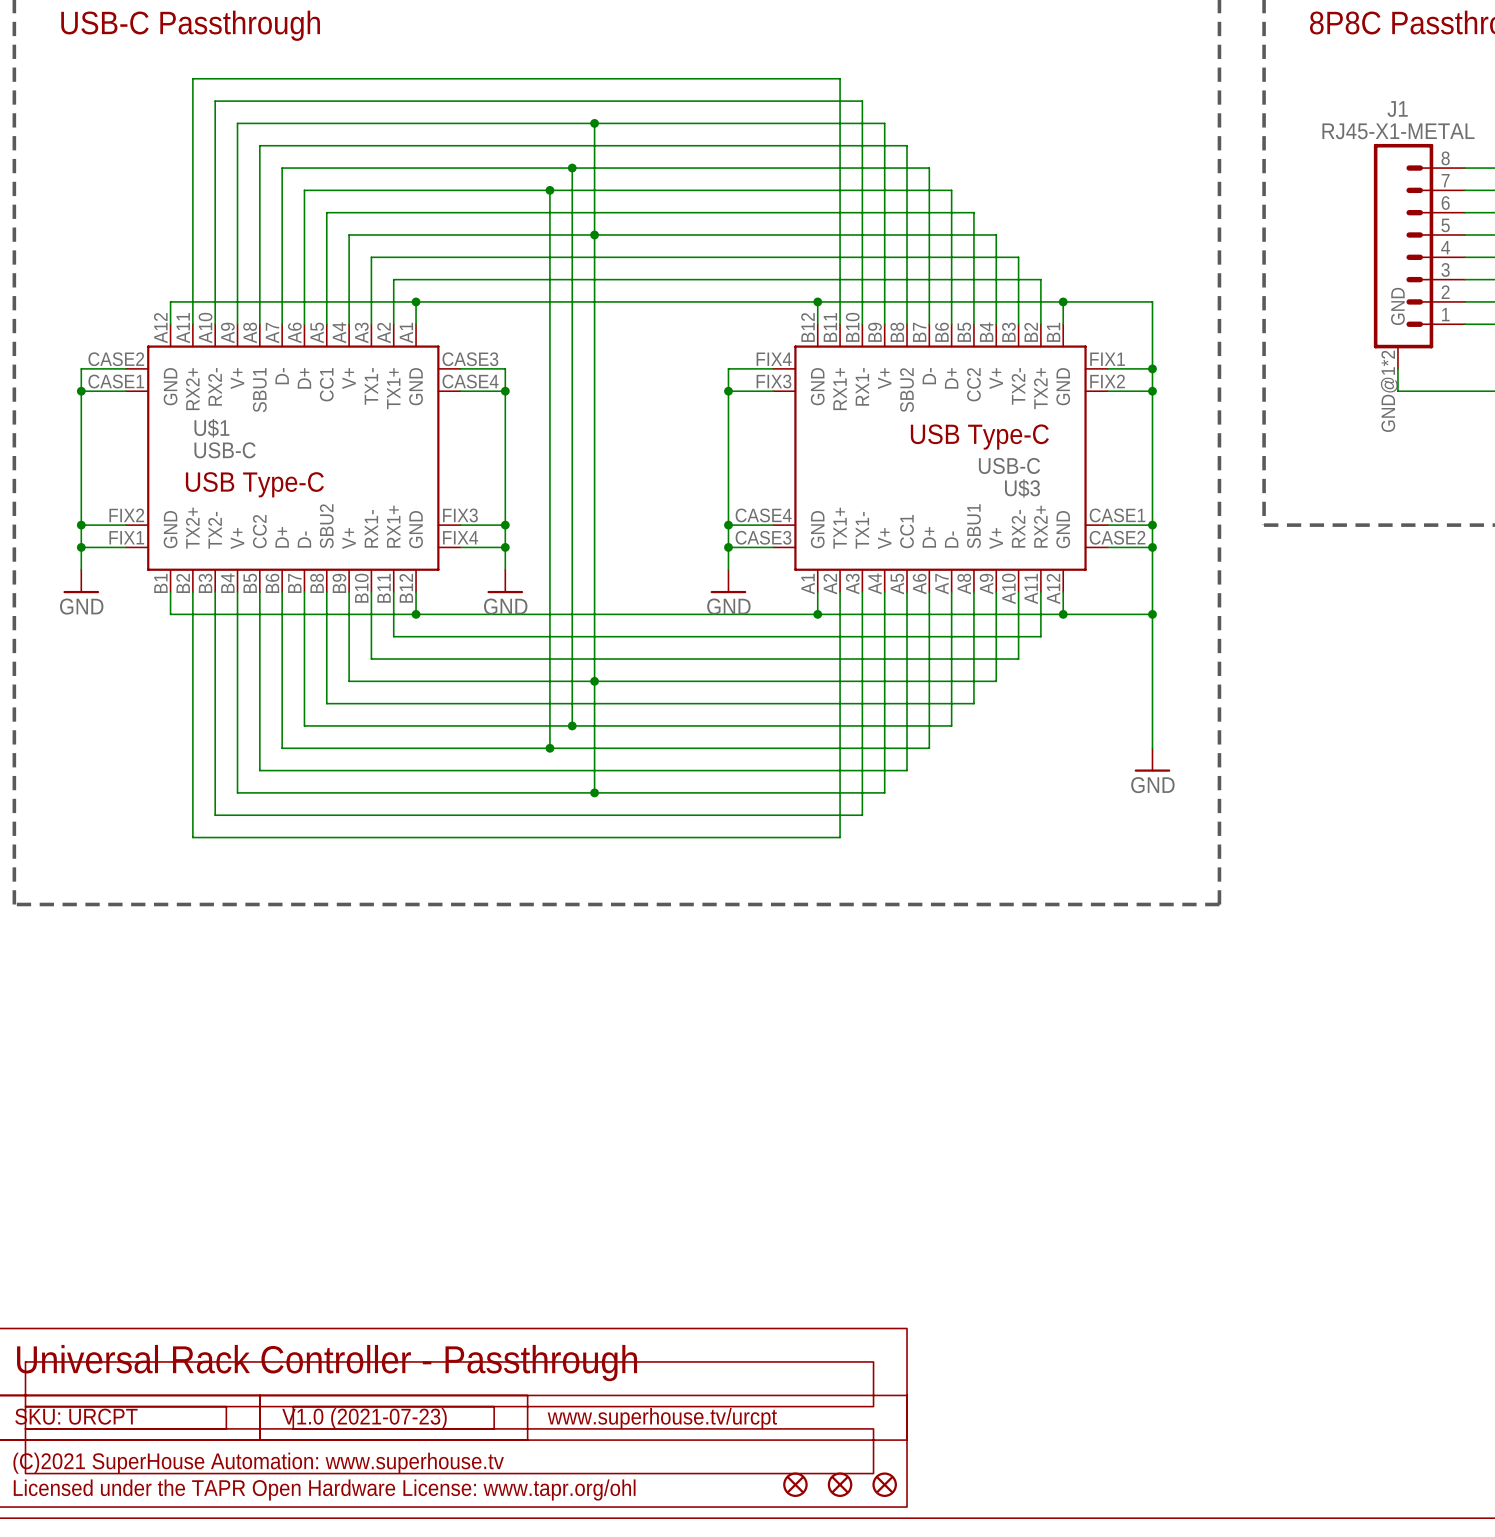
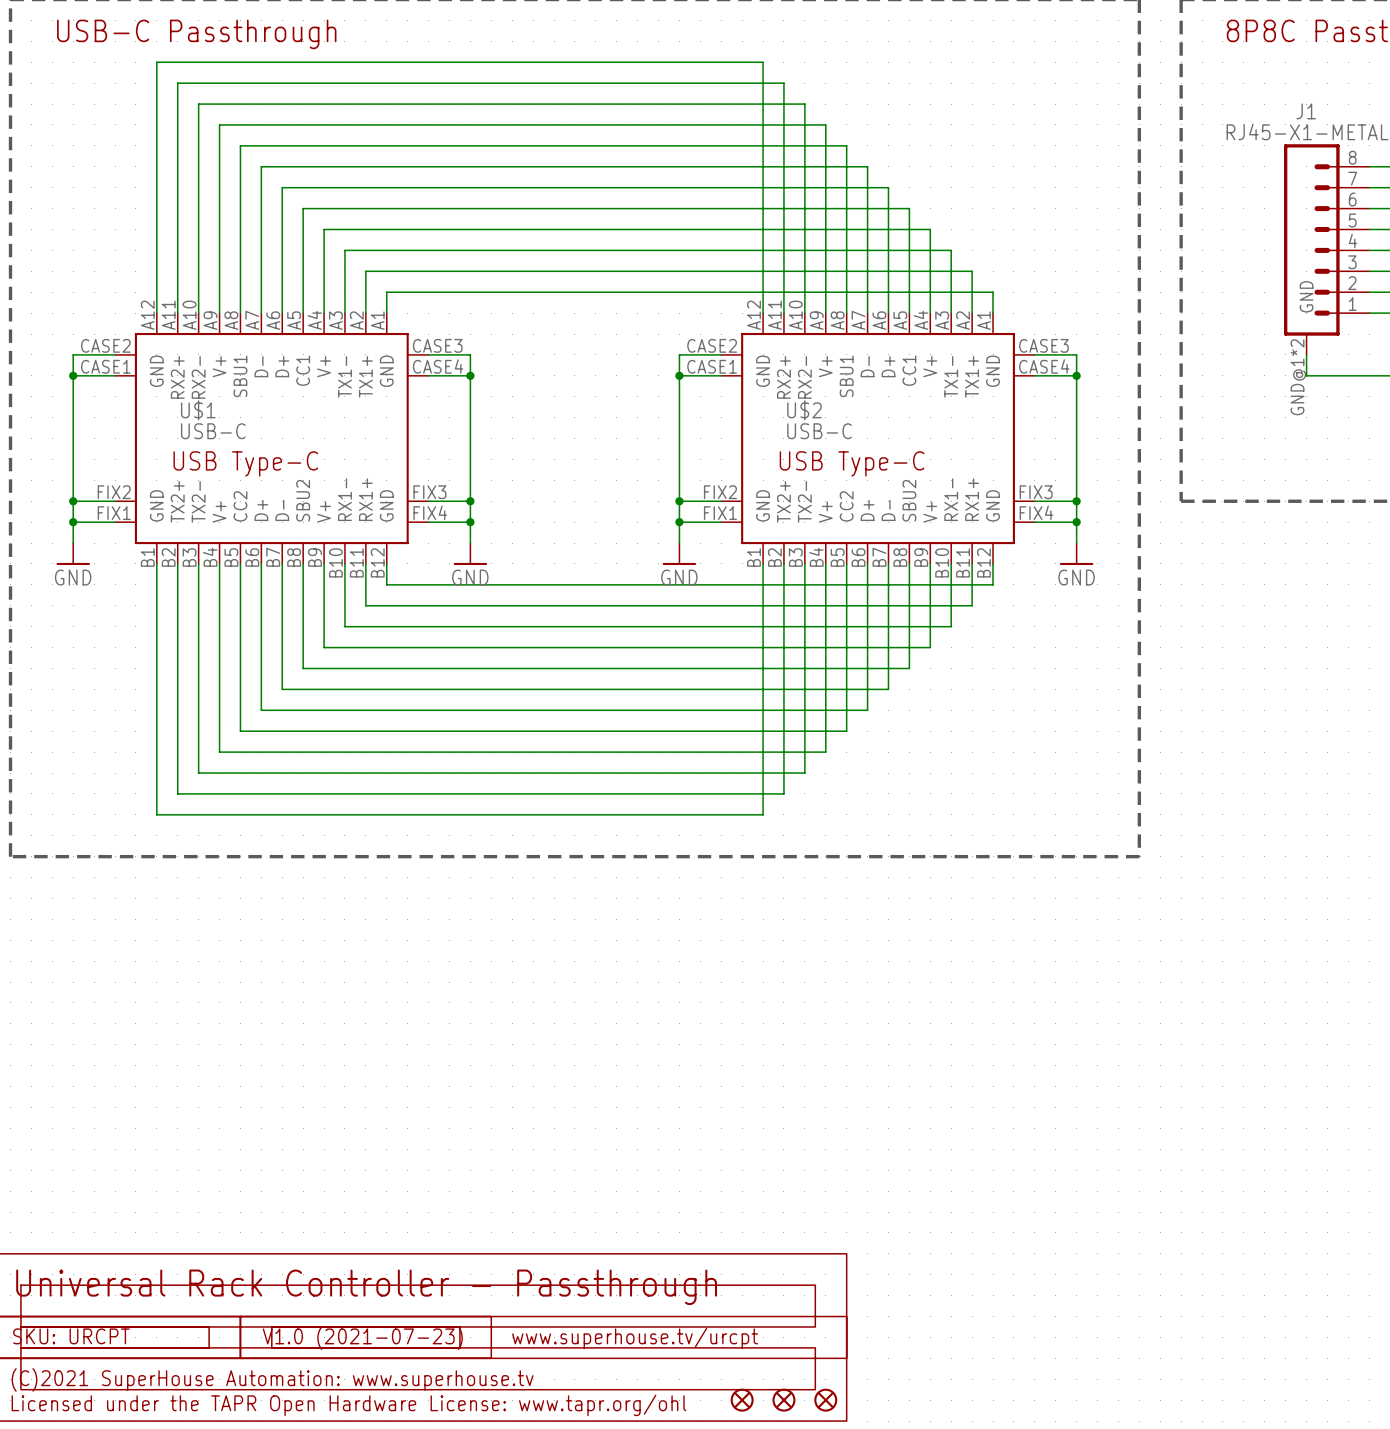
wire: (594, 123) (594, 792) -> none
junction: (594, 123) -> none
wire: (572, 168) (572, 725) -> none
junction: (572, 168) -> none
wire: (549, 190) (549, 748) -> none
junction: (549, 190) -> none
junction: (594, 234) -> none
wire: (170, 301) (416, 301) -> (156, 292) (156, 62) (763, 62) (763, 292)
junction: (416, 301) -> none
junction: (817, 301) -> none
wire: (1063, 301) (1152, 301) (1152, 368) -> none
junction: (1063, 301) -> none
U$3 symbol: [773, 324, 1108, 593] -> [721, 313, 1035, 564]
junction: (1152, 368) -> none
U$3 value position: USB-C (1009, 465) -> USB-C (819, 431)
U$3 name: U$3 (1022, 488) -> U$2 (804, 410)
wire: (1152, 569) (1152, 748) -> none
wire: (170, 614) (416, 614) -> (156, 584) (156, 814) (763, 814) (763, 584)
junction: (416, 614) -> none
junction: (817, 614) -> none
wire: (1063, 614) (1152, 614) -> none
junction: (1063, 614) -> none
junction: (1152, 614) -> none
junction: (594, 681) -> none
junction: (572, 725) -> none
junction: (549, 748) -> none
power symbol position: GND (1152, 759) -> GND (1076, 554)
junction: (594, 792) -> none

